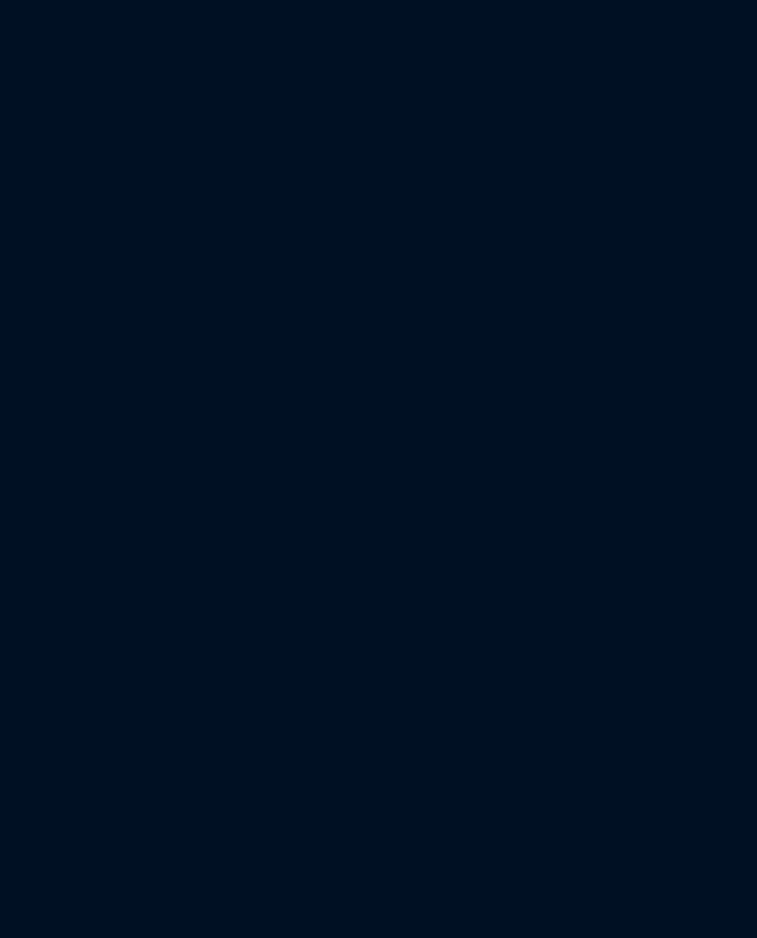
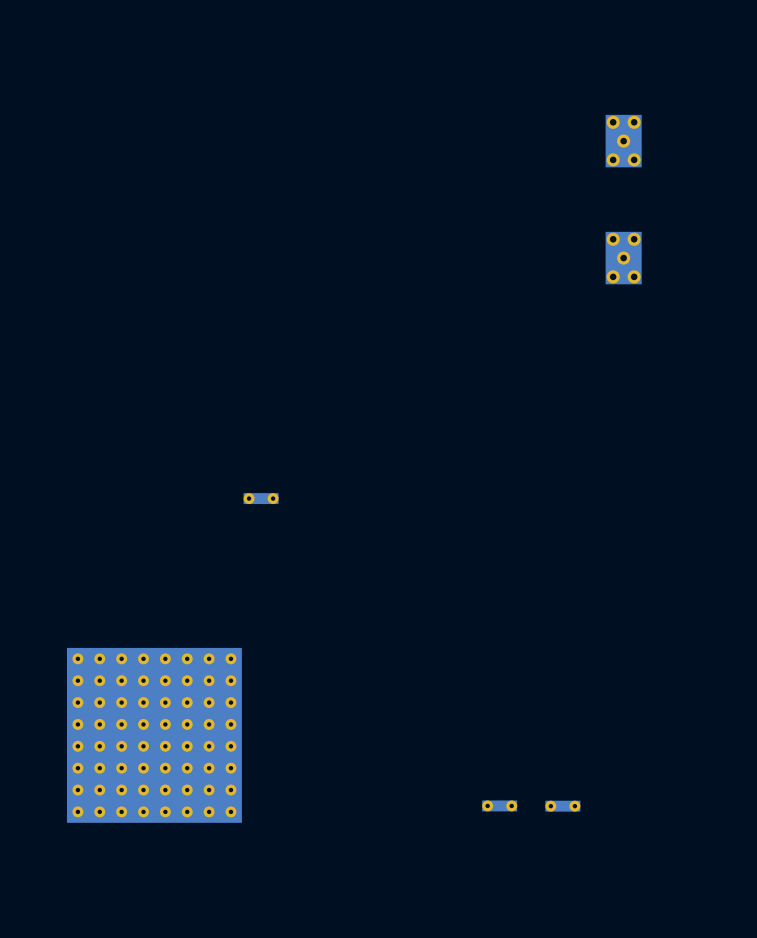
part: none -> (623, 141)
part: none -> (623, 258)
part: none -> (261, 498)
part: none -> (154, 735)
part: none -> (499, 805)
part: none -> (562, 806)

